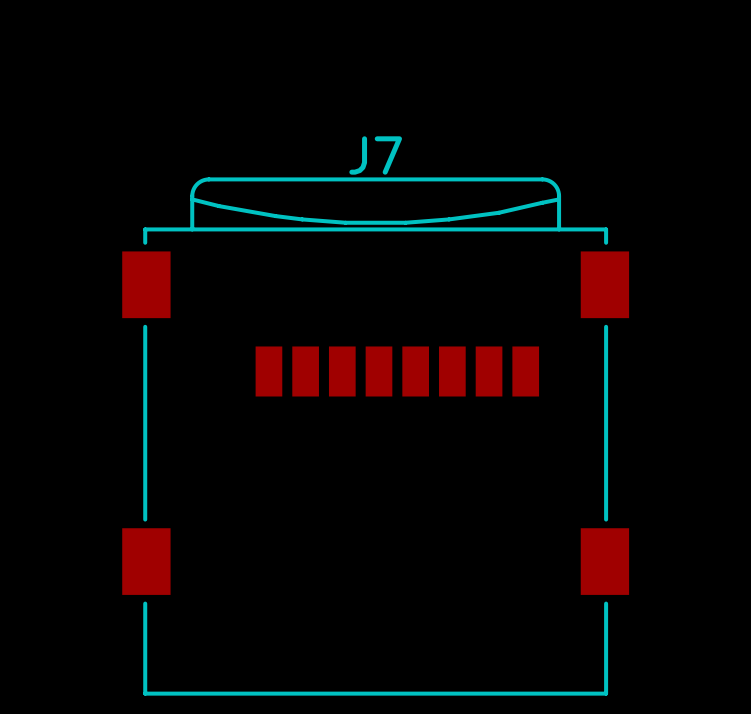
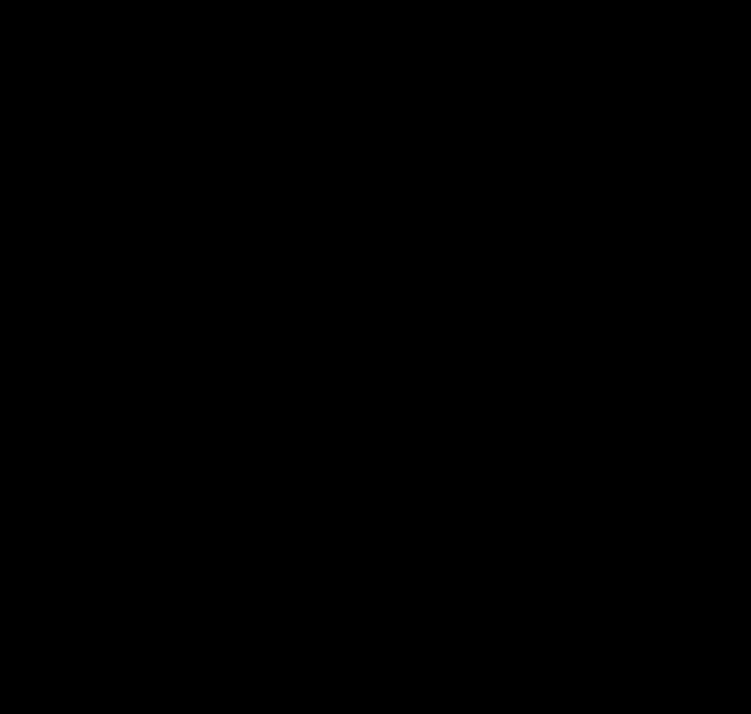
J7: (375, 436) -> none

